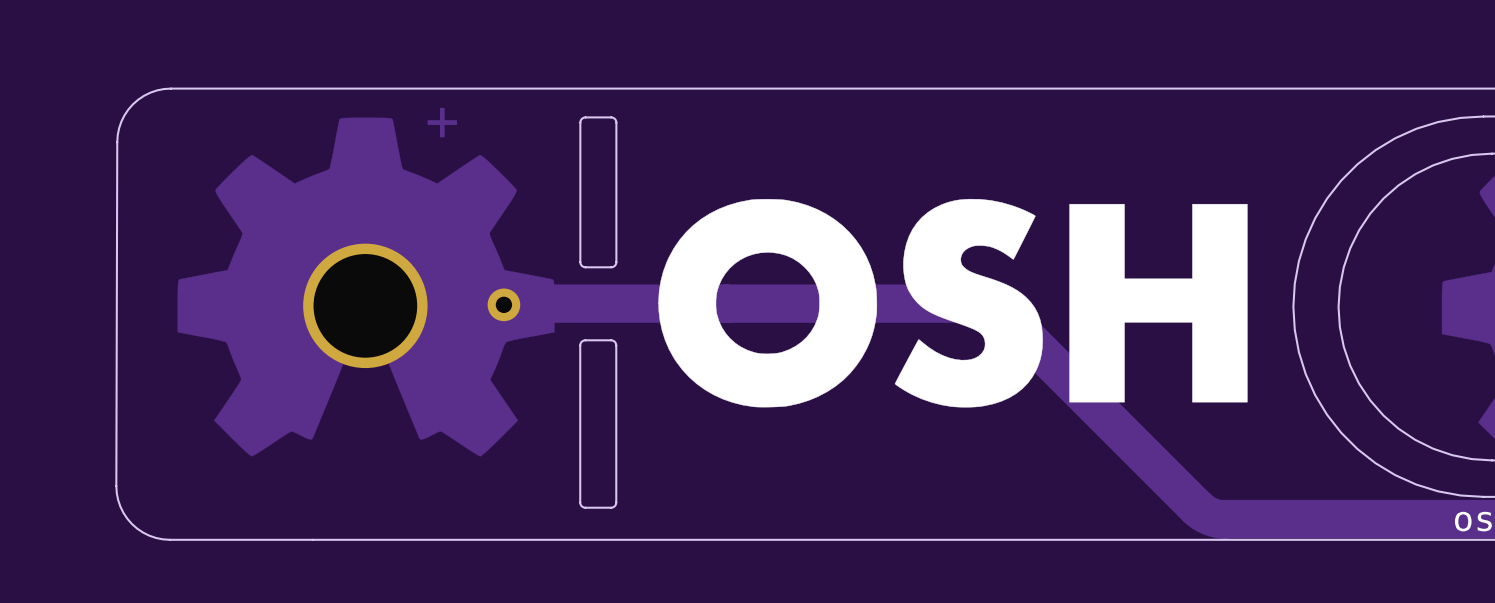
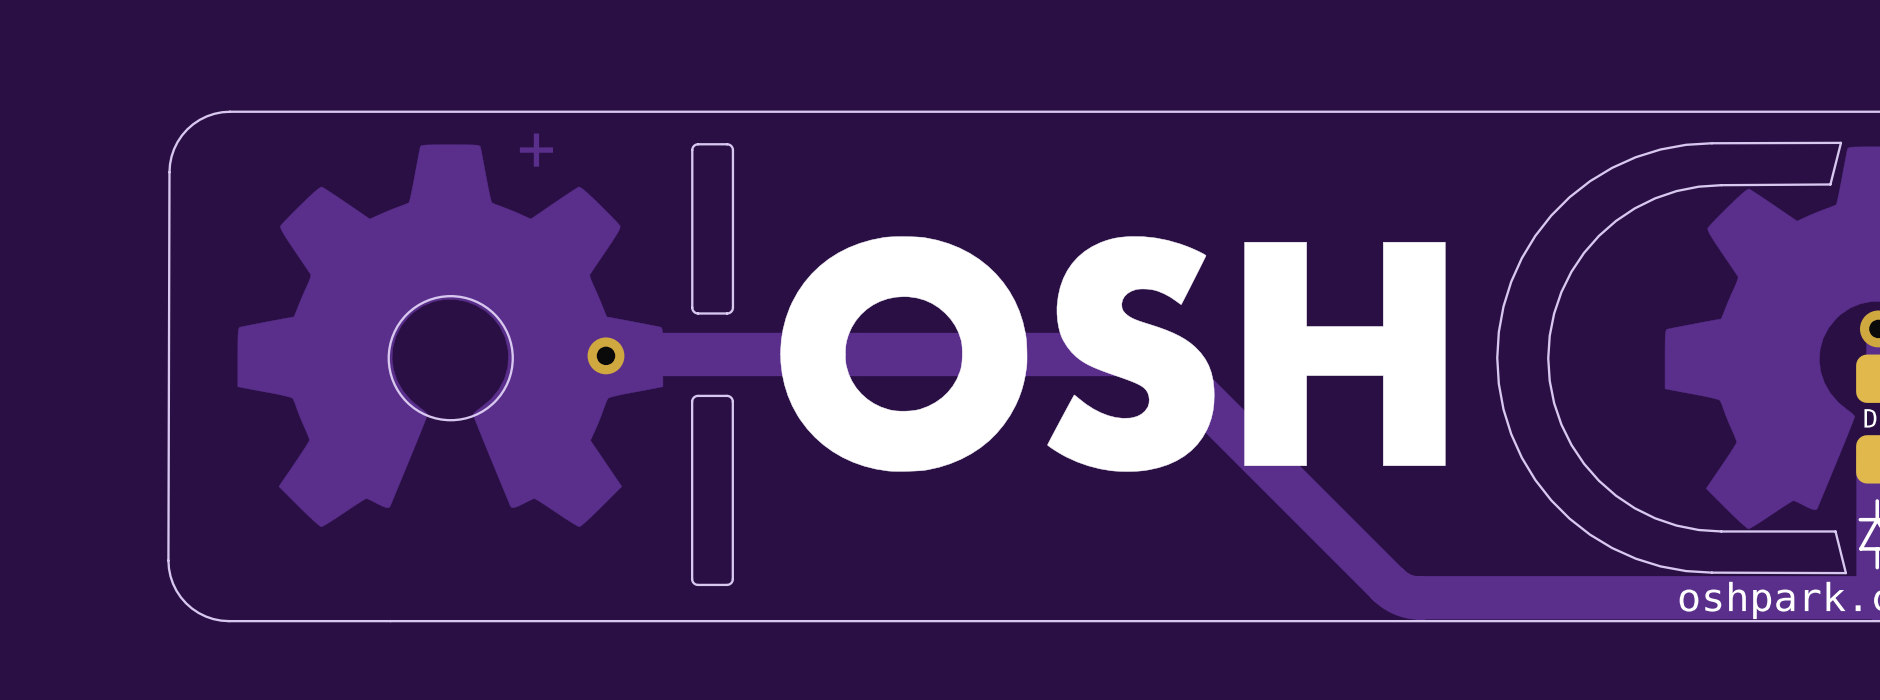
round board edge: none -> [387, 295, 514, 422]
via: (365, 305) -> none

